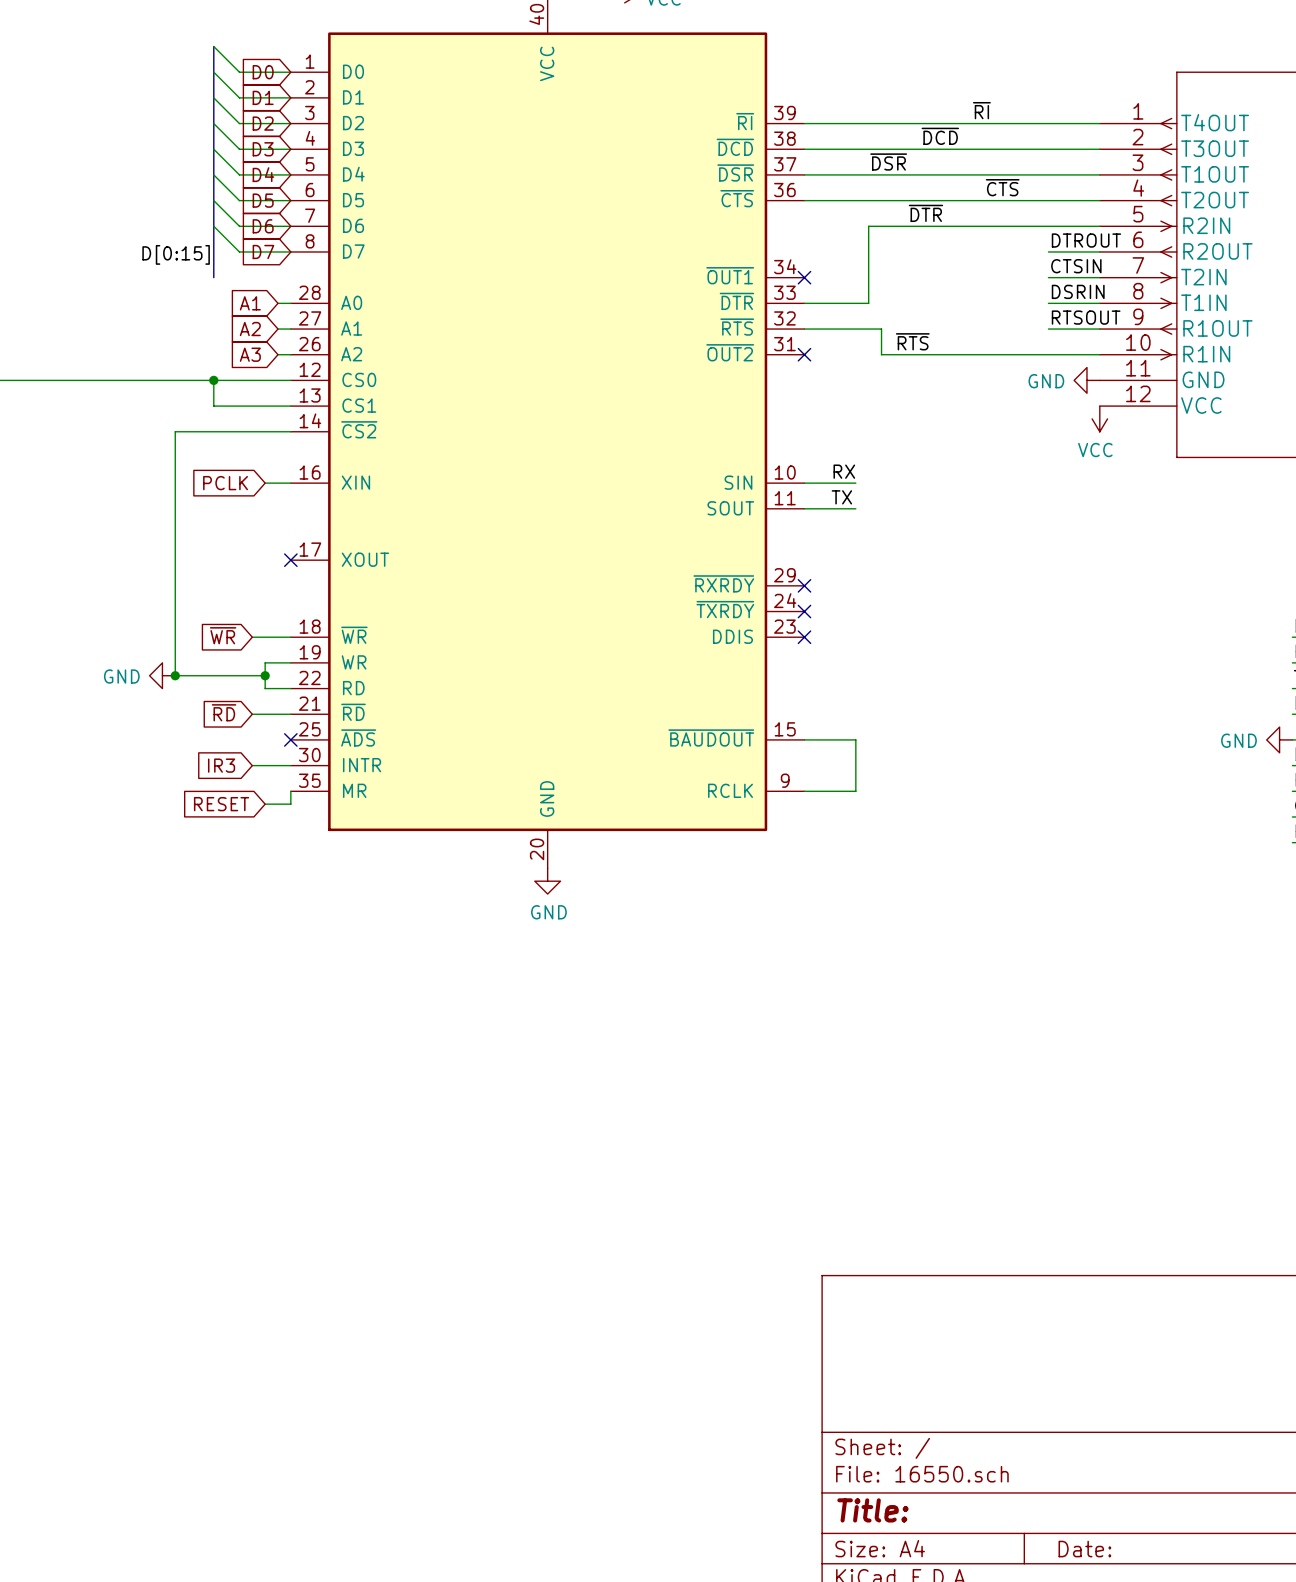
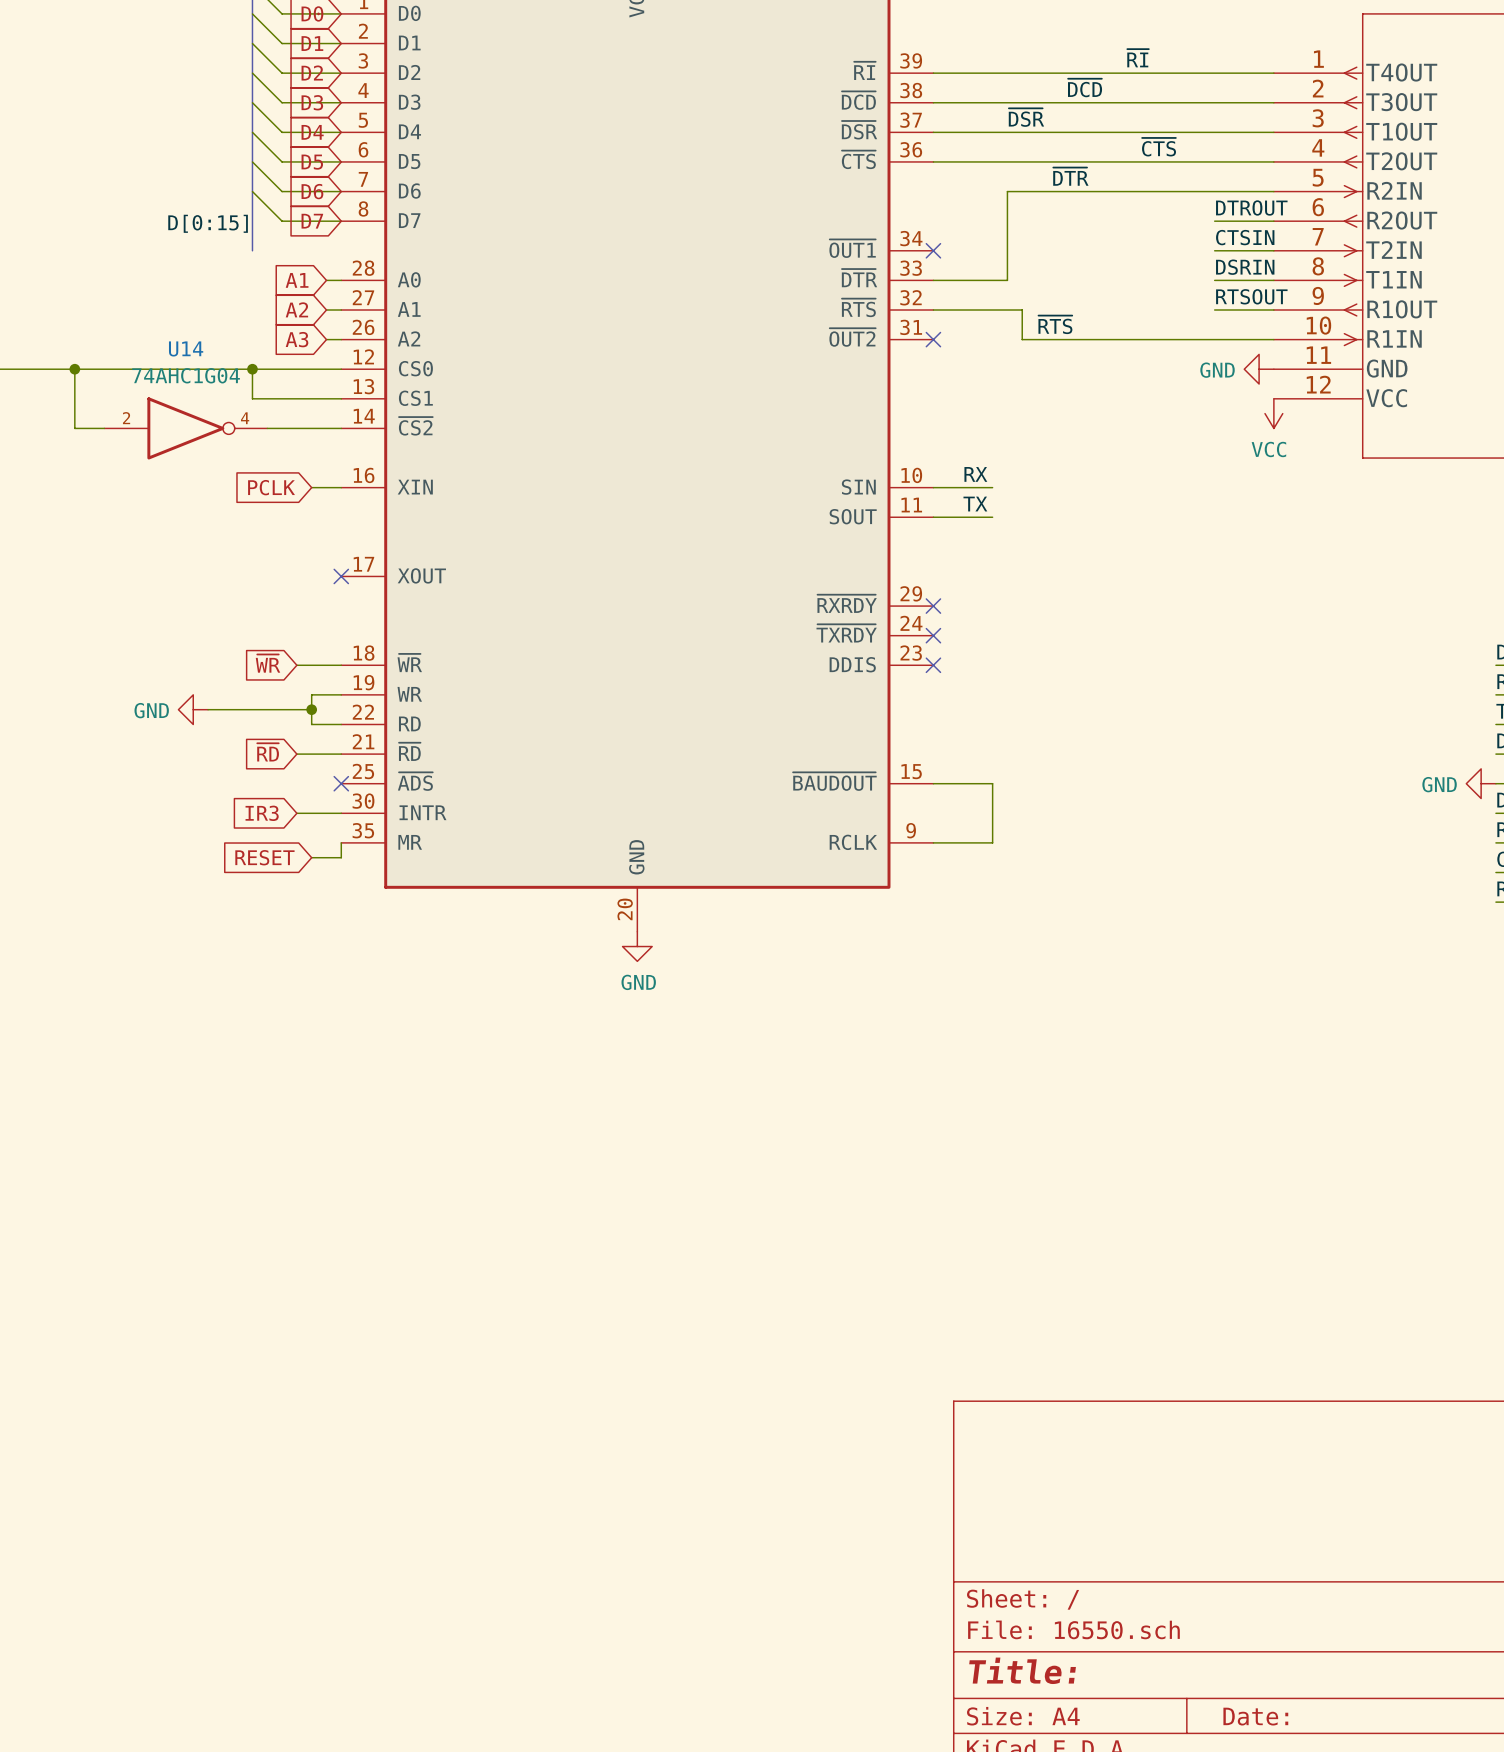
wire: none -> (74, 369) (74, 428) (104, 428)
junction: none -> (74, 369)
U14: none -> 74AHC1G04 (185, 428)
wire: (226, 431) (175, 431) (175, 675) -> none
junction: (175, 675) -> none

